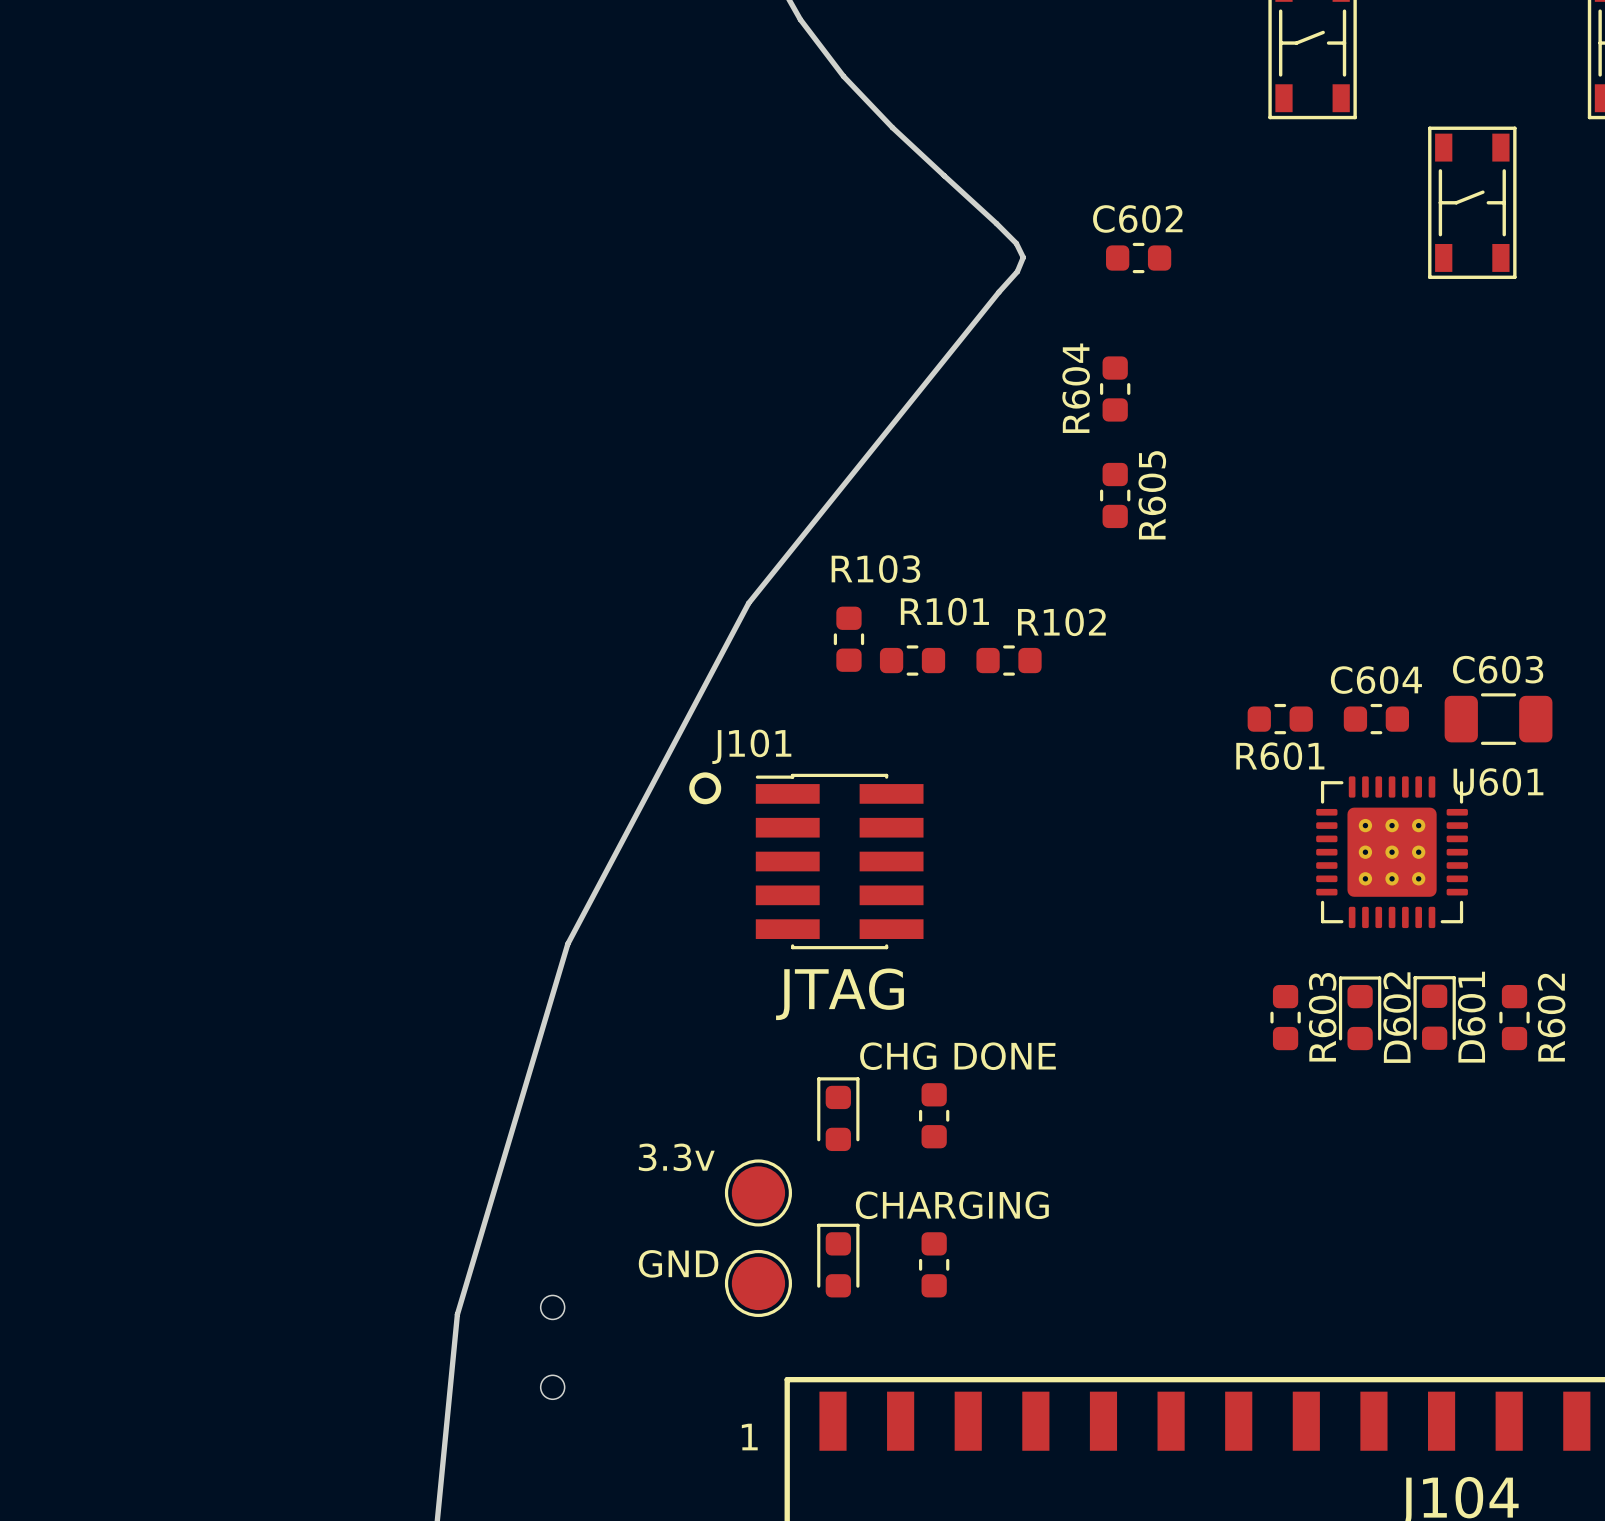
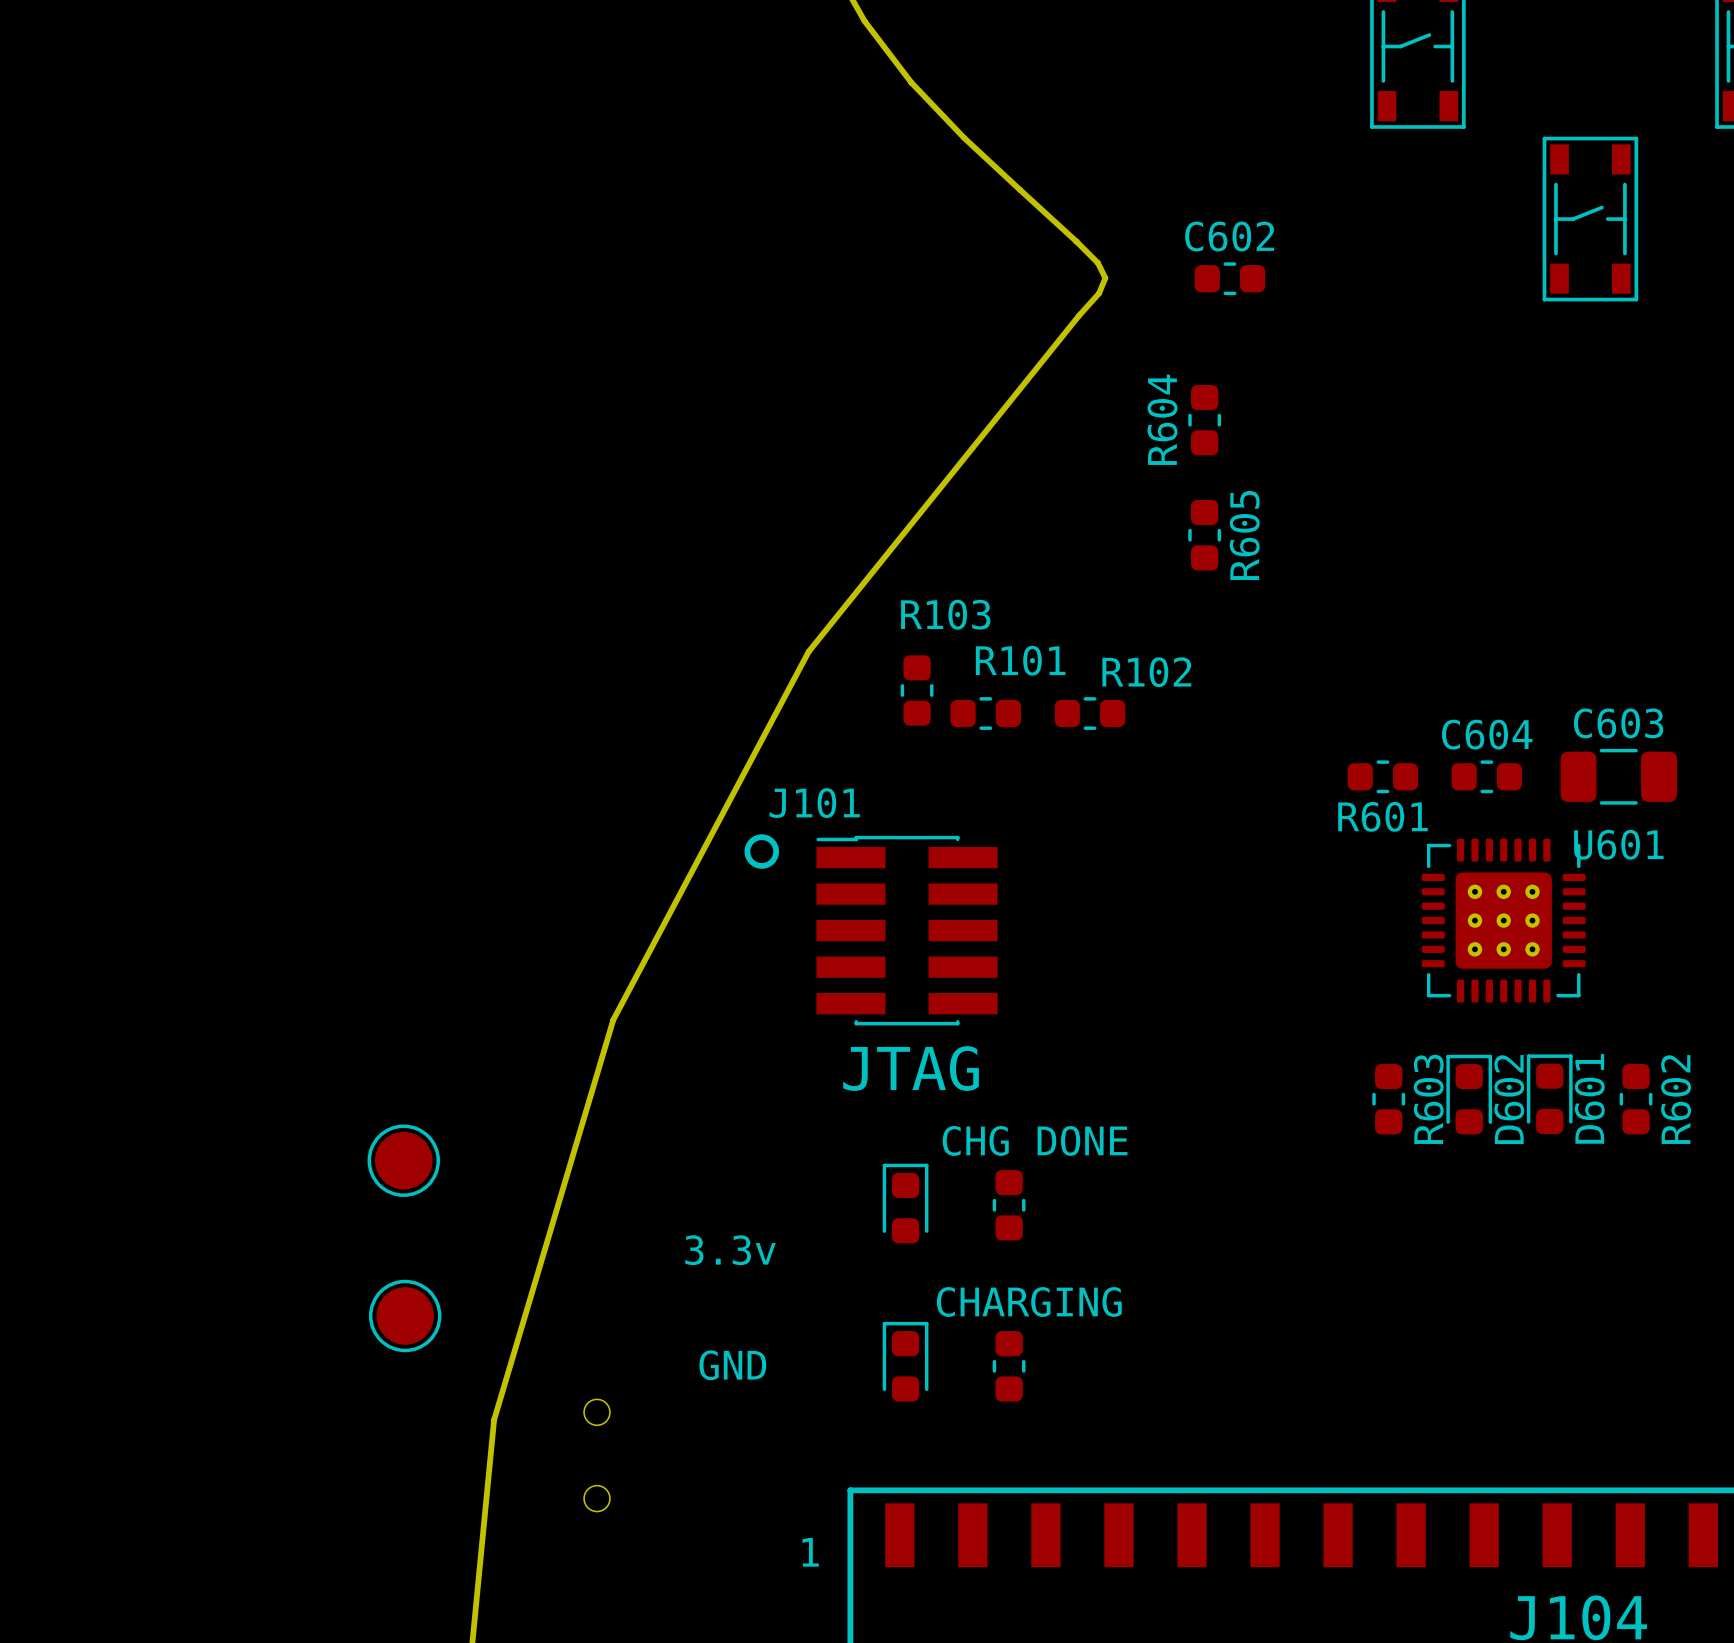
part: none -> (403, 1160)
part: (758, 1192) -> none
part: none -> (405, 1315)
part: (758, 1283) -> none

